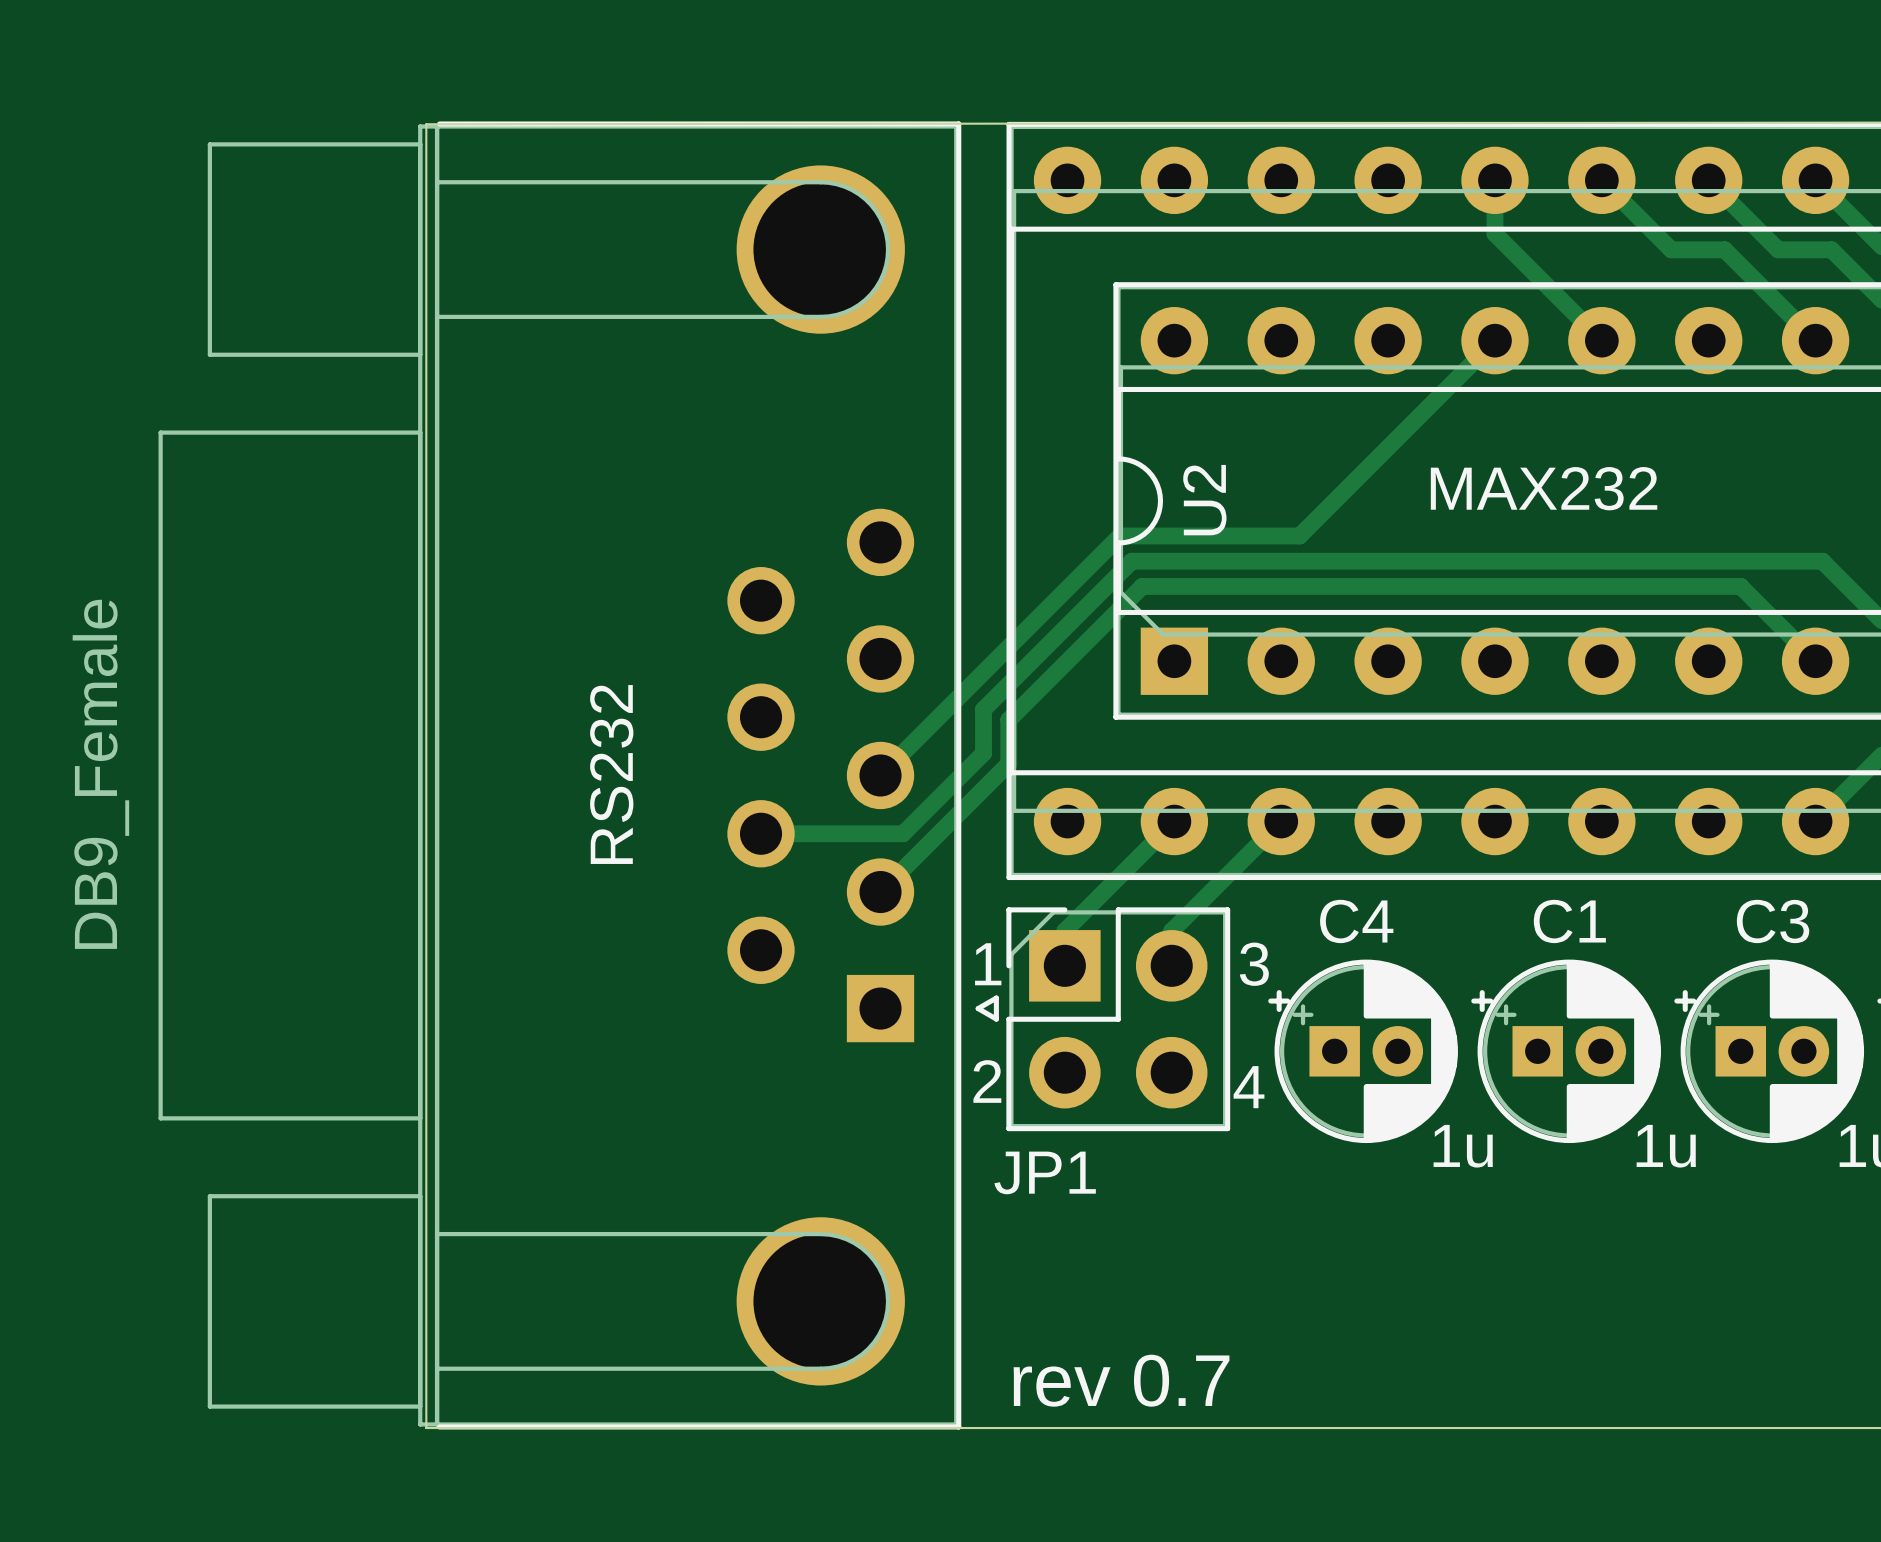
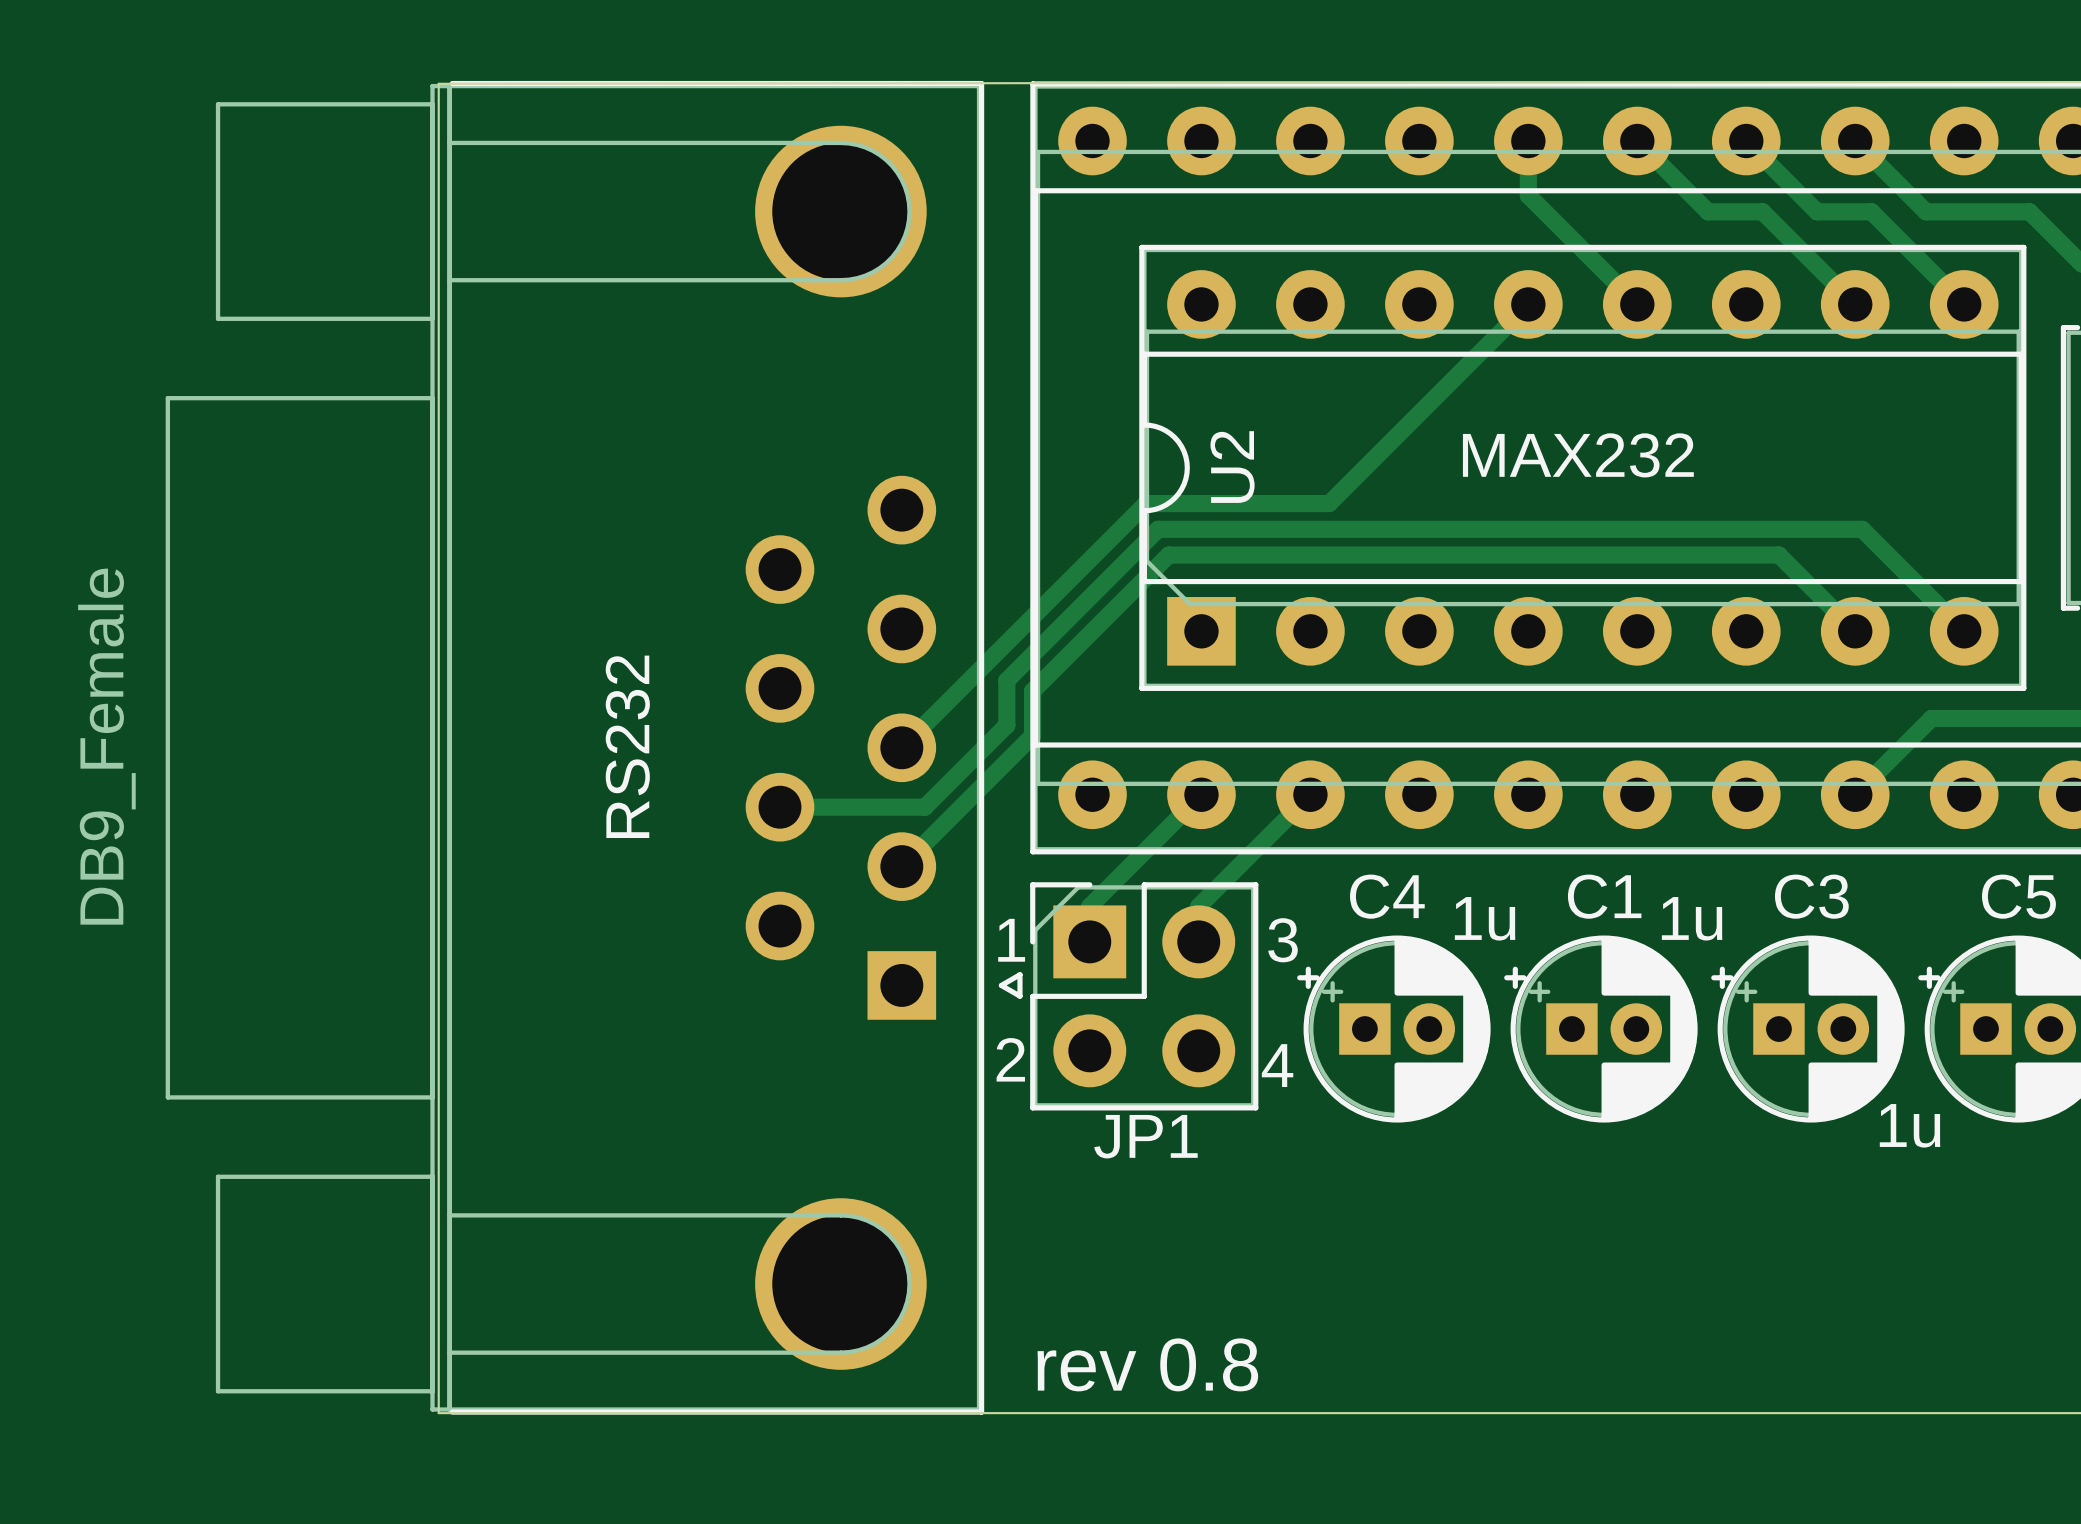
C4 value position: 1u (1463, 1146) -> 1u (1485, 918)
C1 value position: 1u (1666, 1146) -> 1u (1692, 918)
JP1 name position: JP1 (1045, 1172) -> JP1 (1145, 1136)
text: rev 0.7 (1121, 1380) -> rev 0.8 (1147, 1364)

